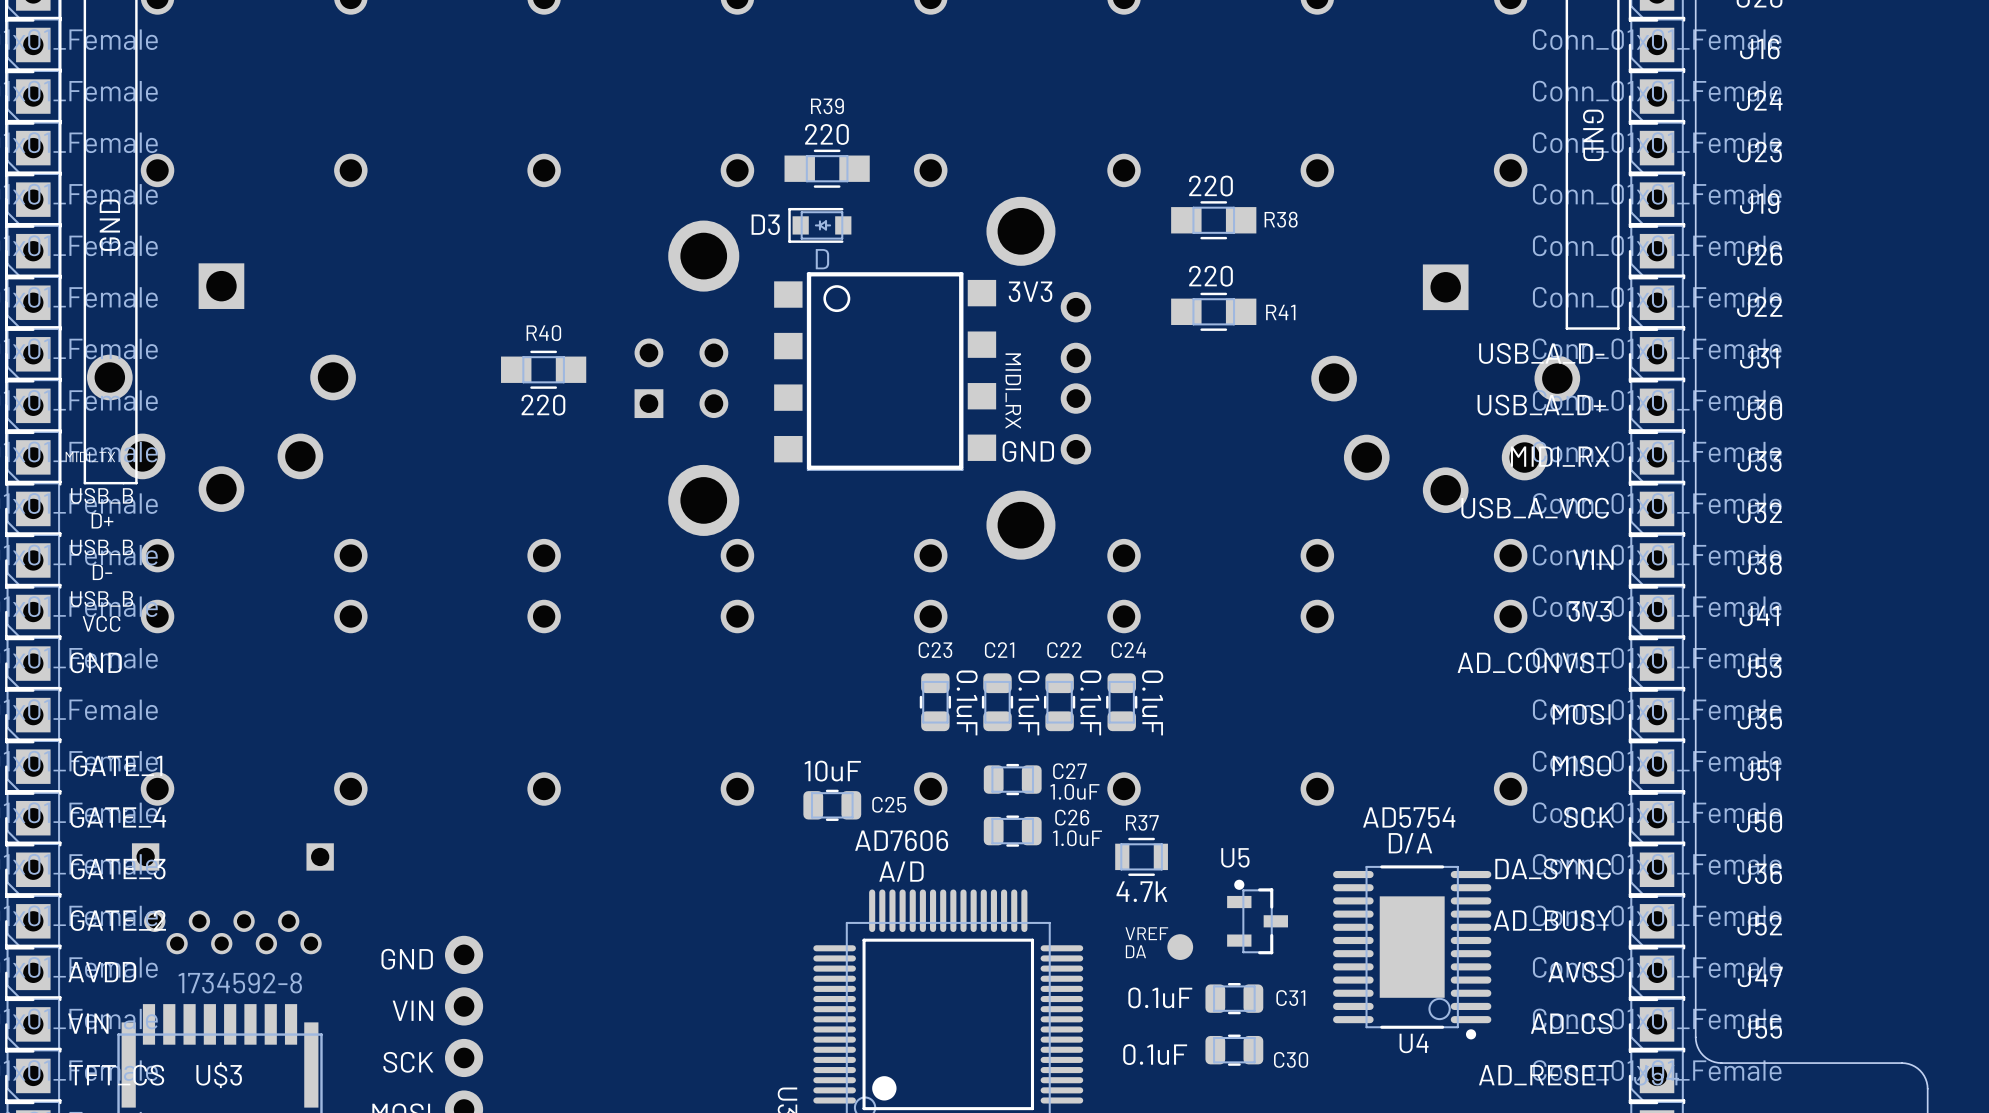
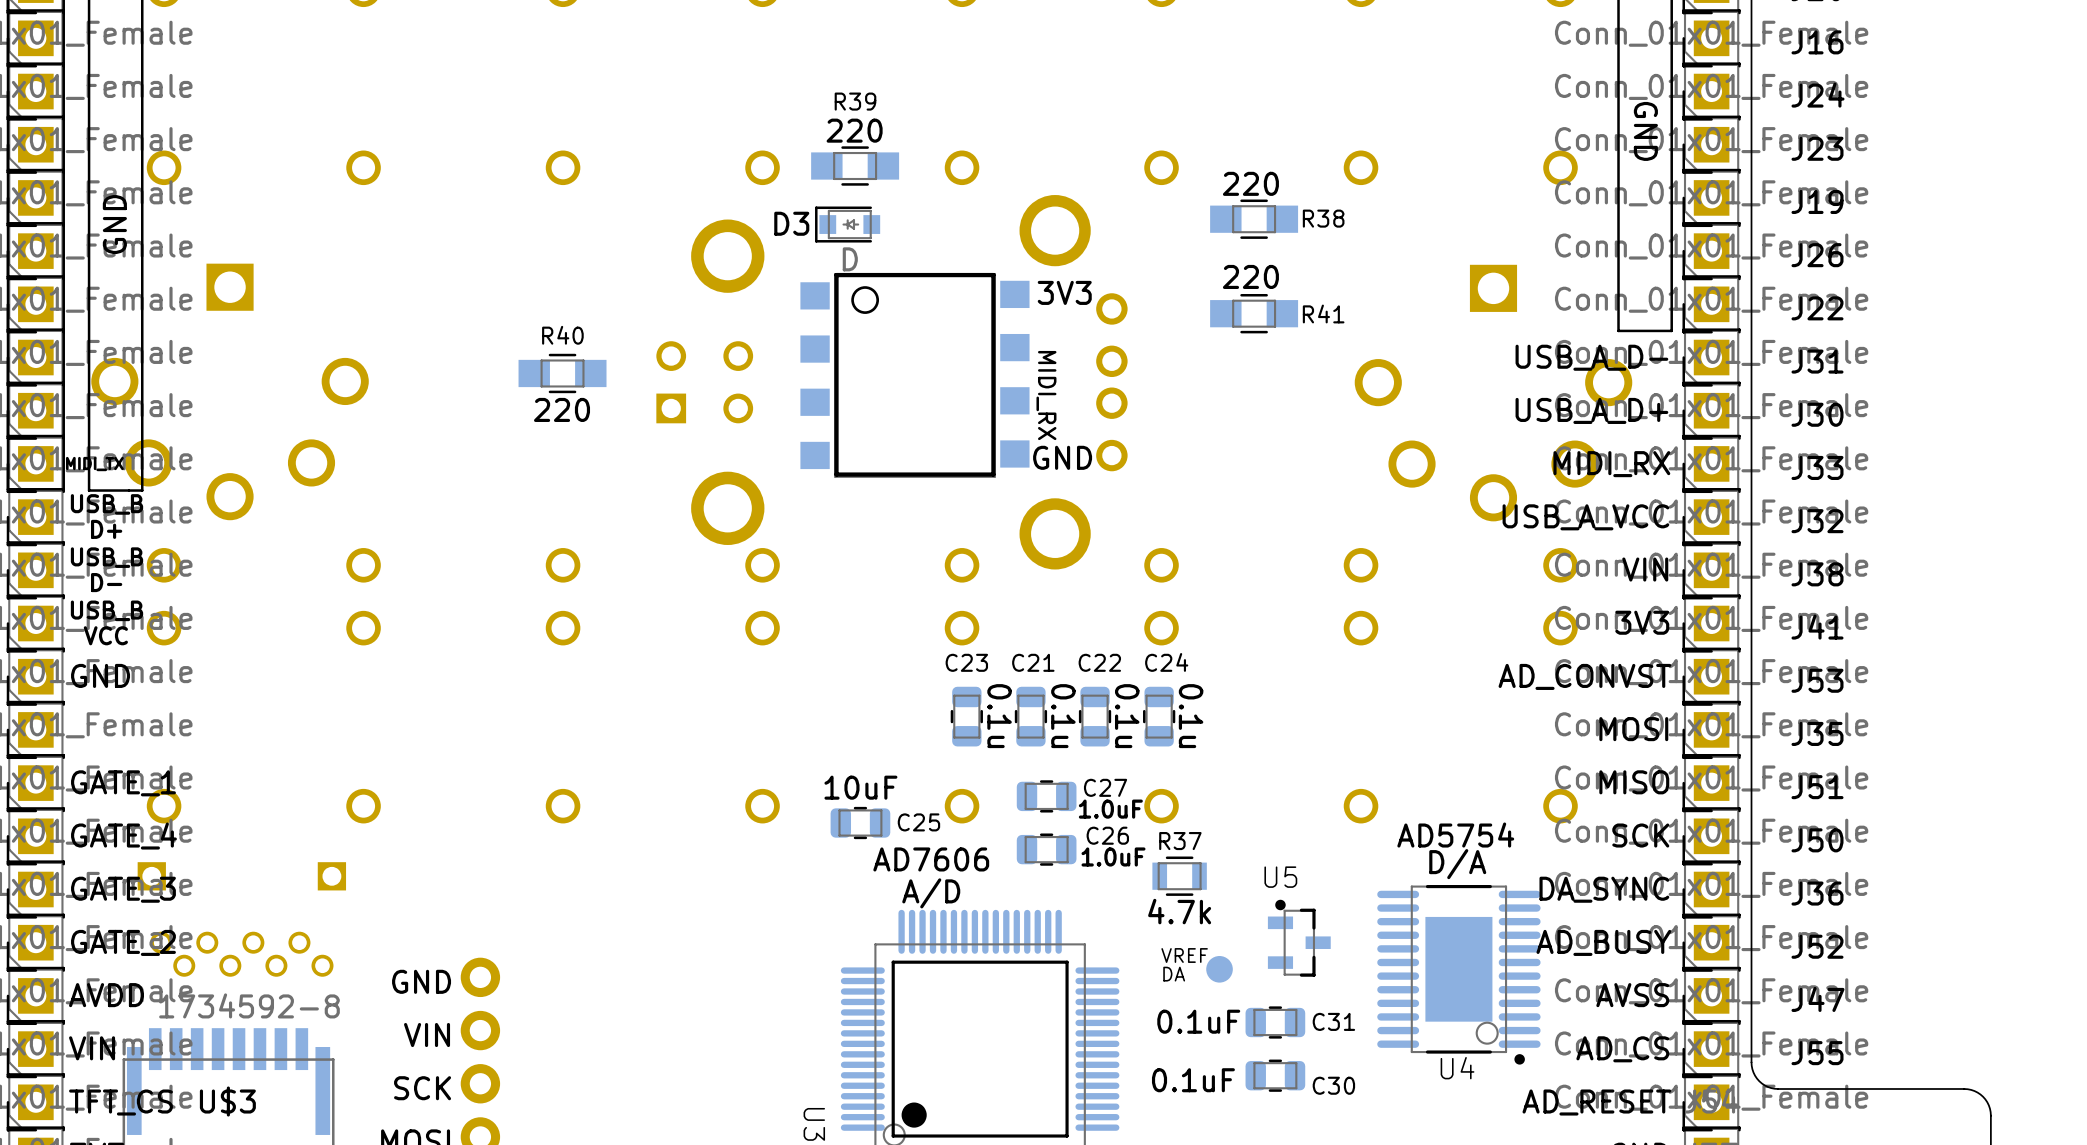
C23 value: 0.1uF (967, 702) -> 0.1u (999, 716)
C21 value: 0.1uF (1028, 702) -> 0.1u (1063, 716)
C22 value: 0.1uF (1090, 702) -> 0.1u (1127, 716)
C24 value: 0.1uF (1152, 702) -> 0.1u (1191, 716)

